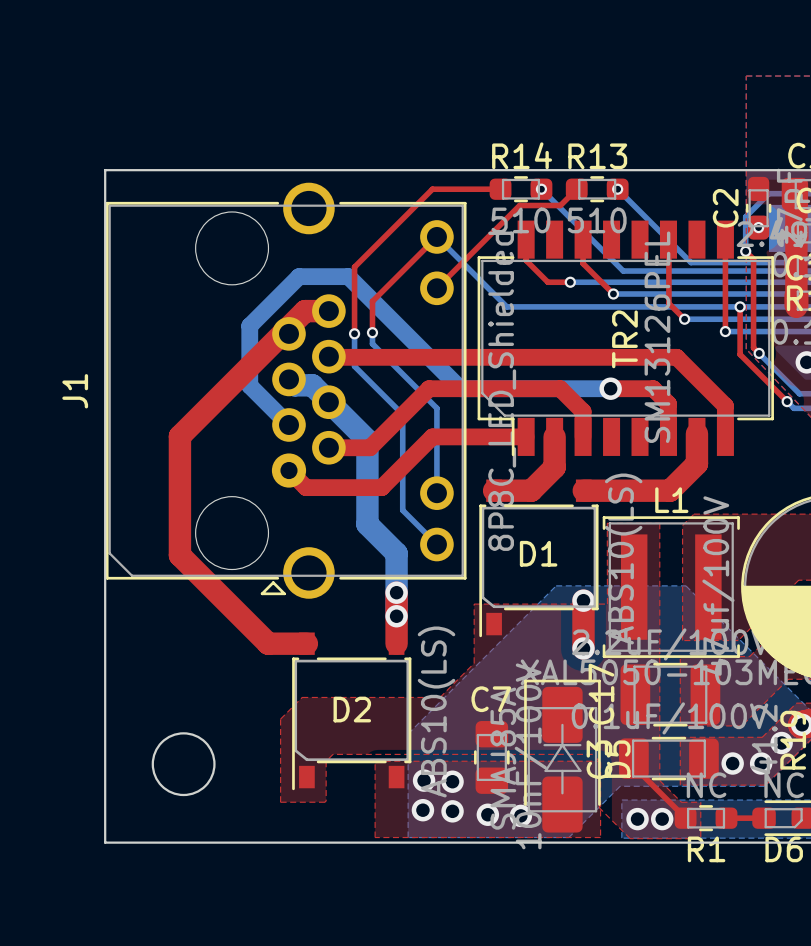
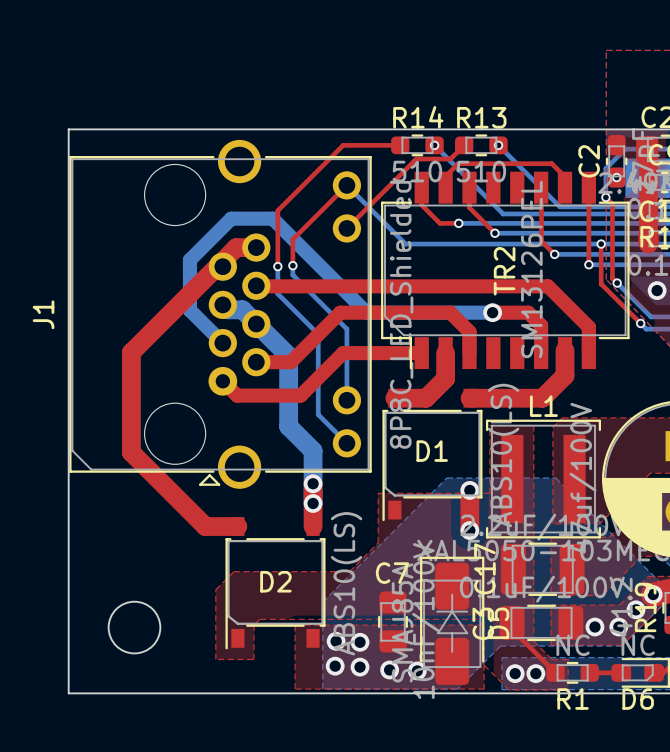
top track: none -> (445, 187) (445, 176) (458, 163) (551, 163) (565, 176) (565, 187)

